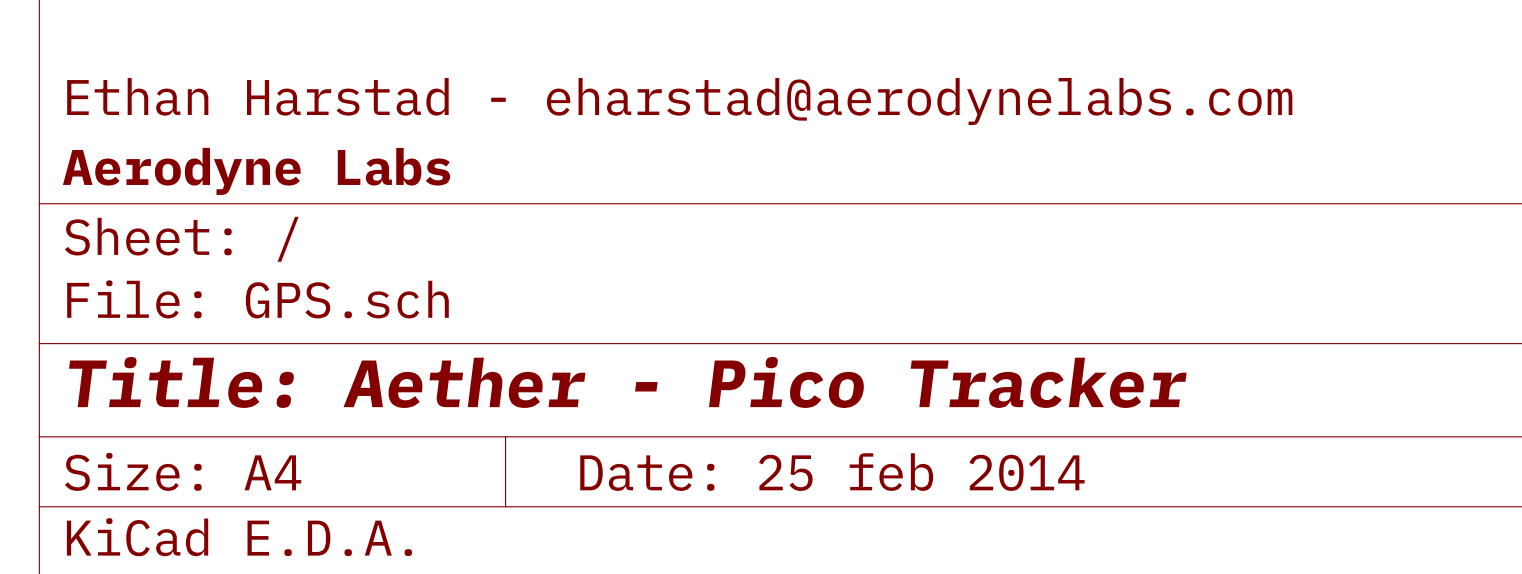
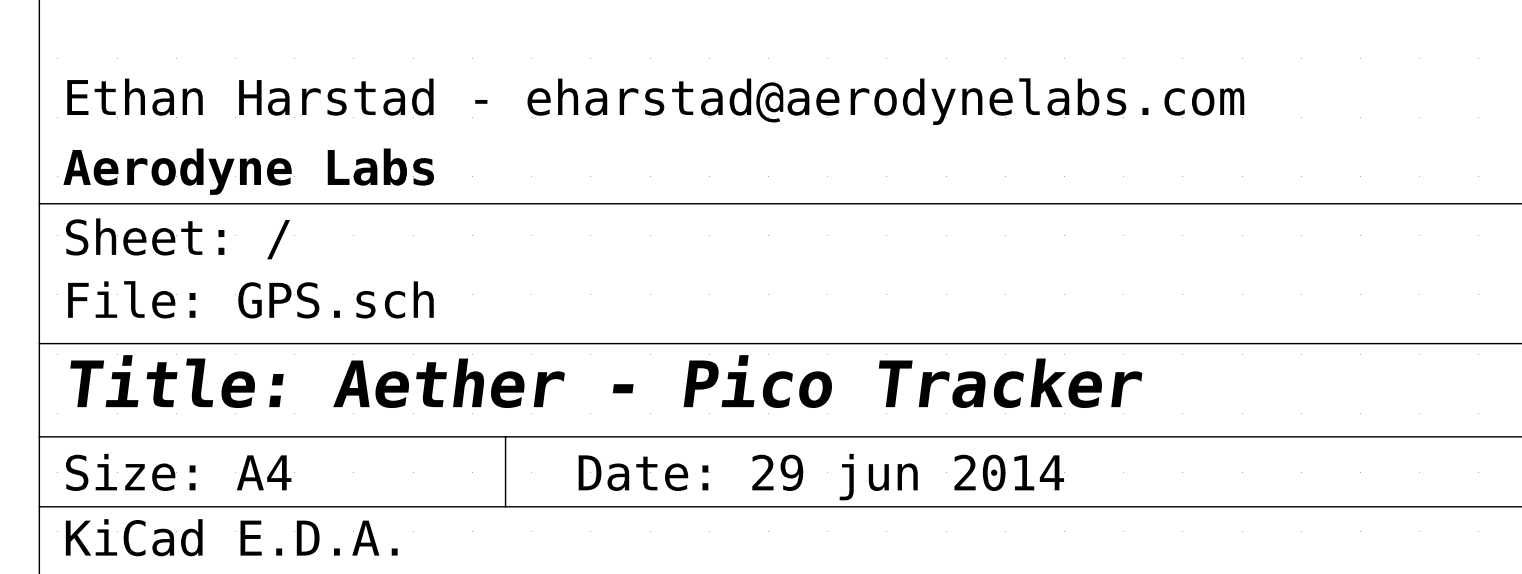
title block: Date: 25 feb 2014 (832, 472) -> Date: 29 jun 2014 (821, 477)

